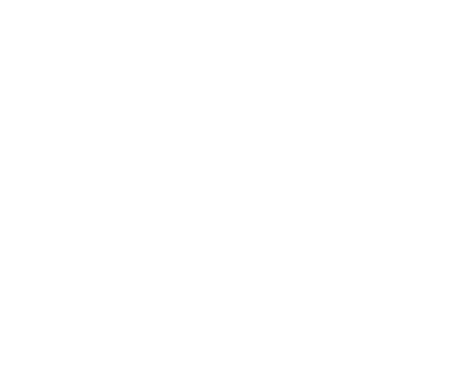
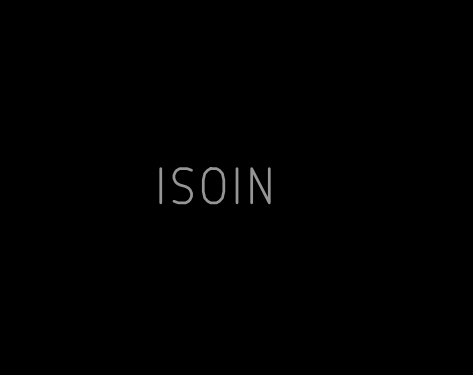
text: none -> ISOIN (215, 185)

